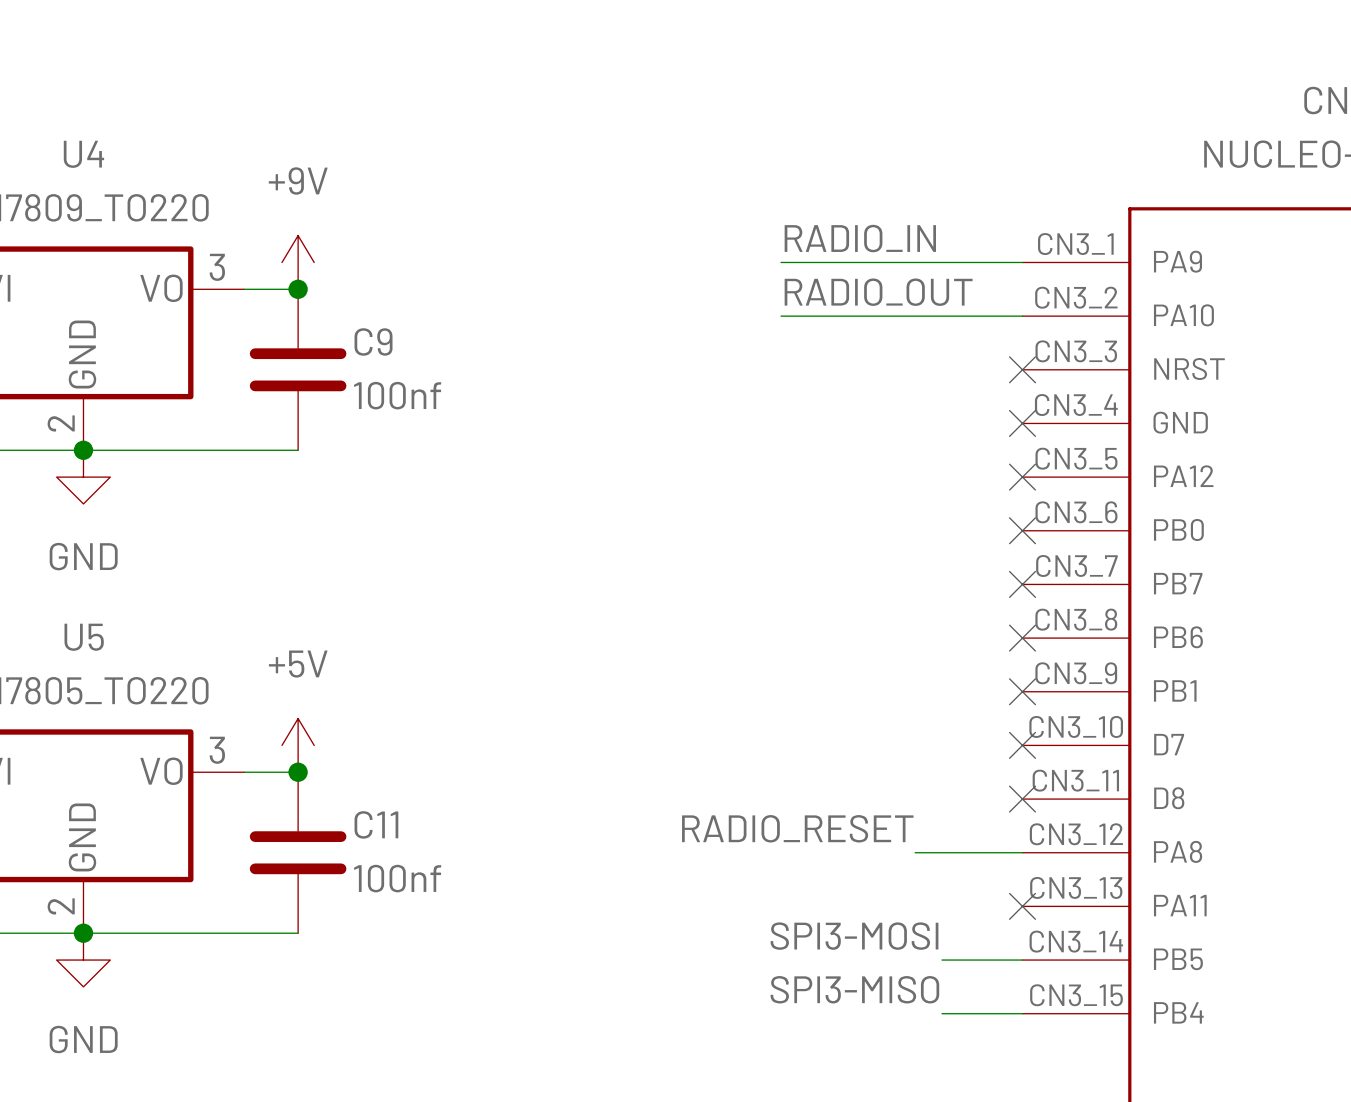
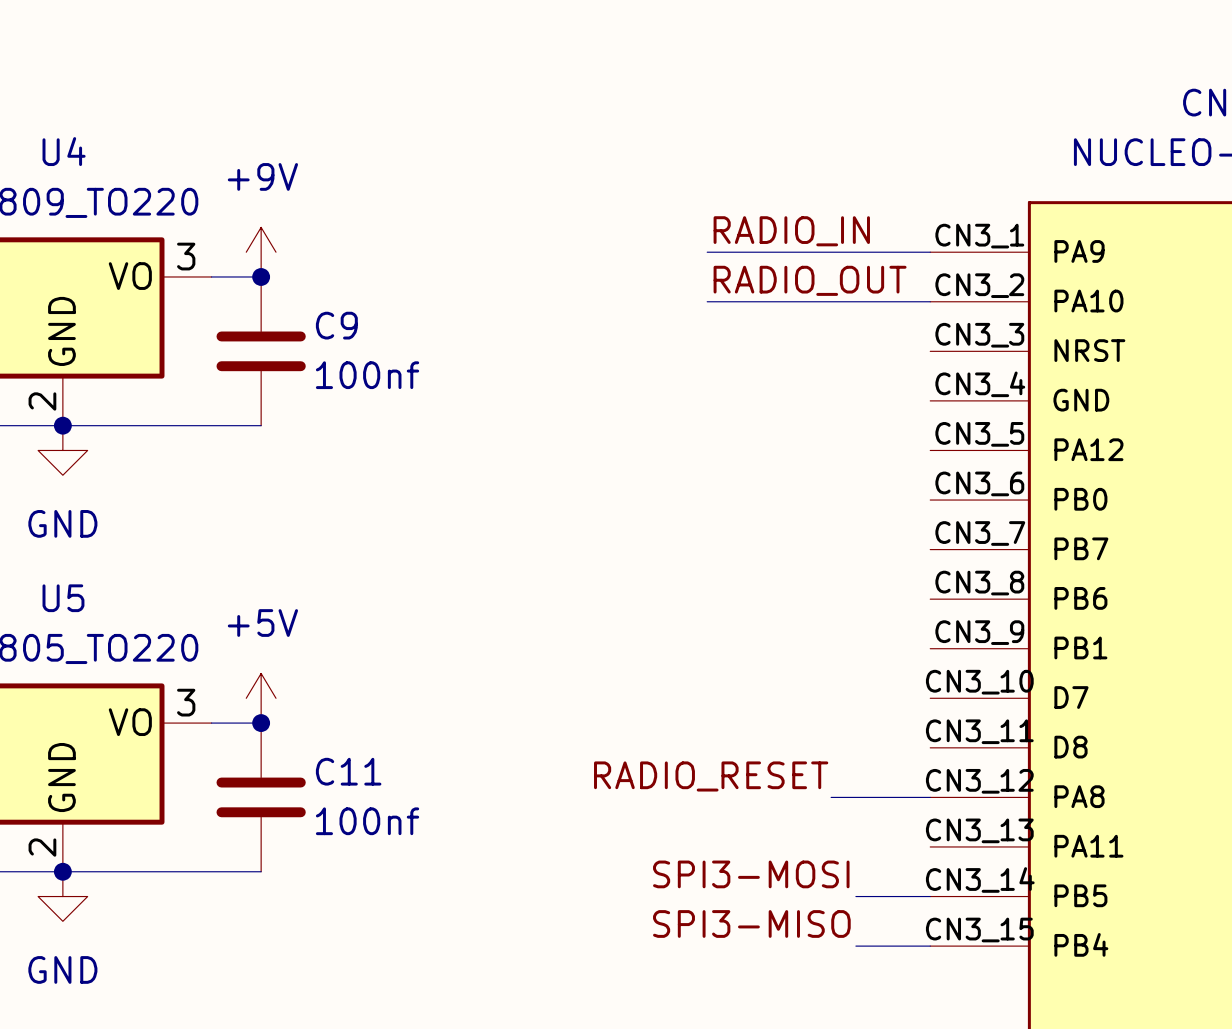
no-connect mark: (1022, 369) -> none
no-connect mark: (1022, 423) -> none
no-connect mark: (1022, 477) -> none
no-connect mark: (1022, 530) -> none
no-connect mark: (1022, 584) -> none
no-connect mark: (1022, 638) -> none
no-connect mark: (1022, 691) -> none
no-connect mark: (1022, 745) -> none
no-connect mark: (1022, 799) -> none
no-connect mark: (1022, 906) -> none

